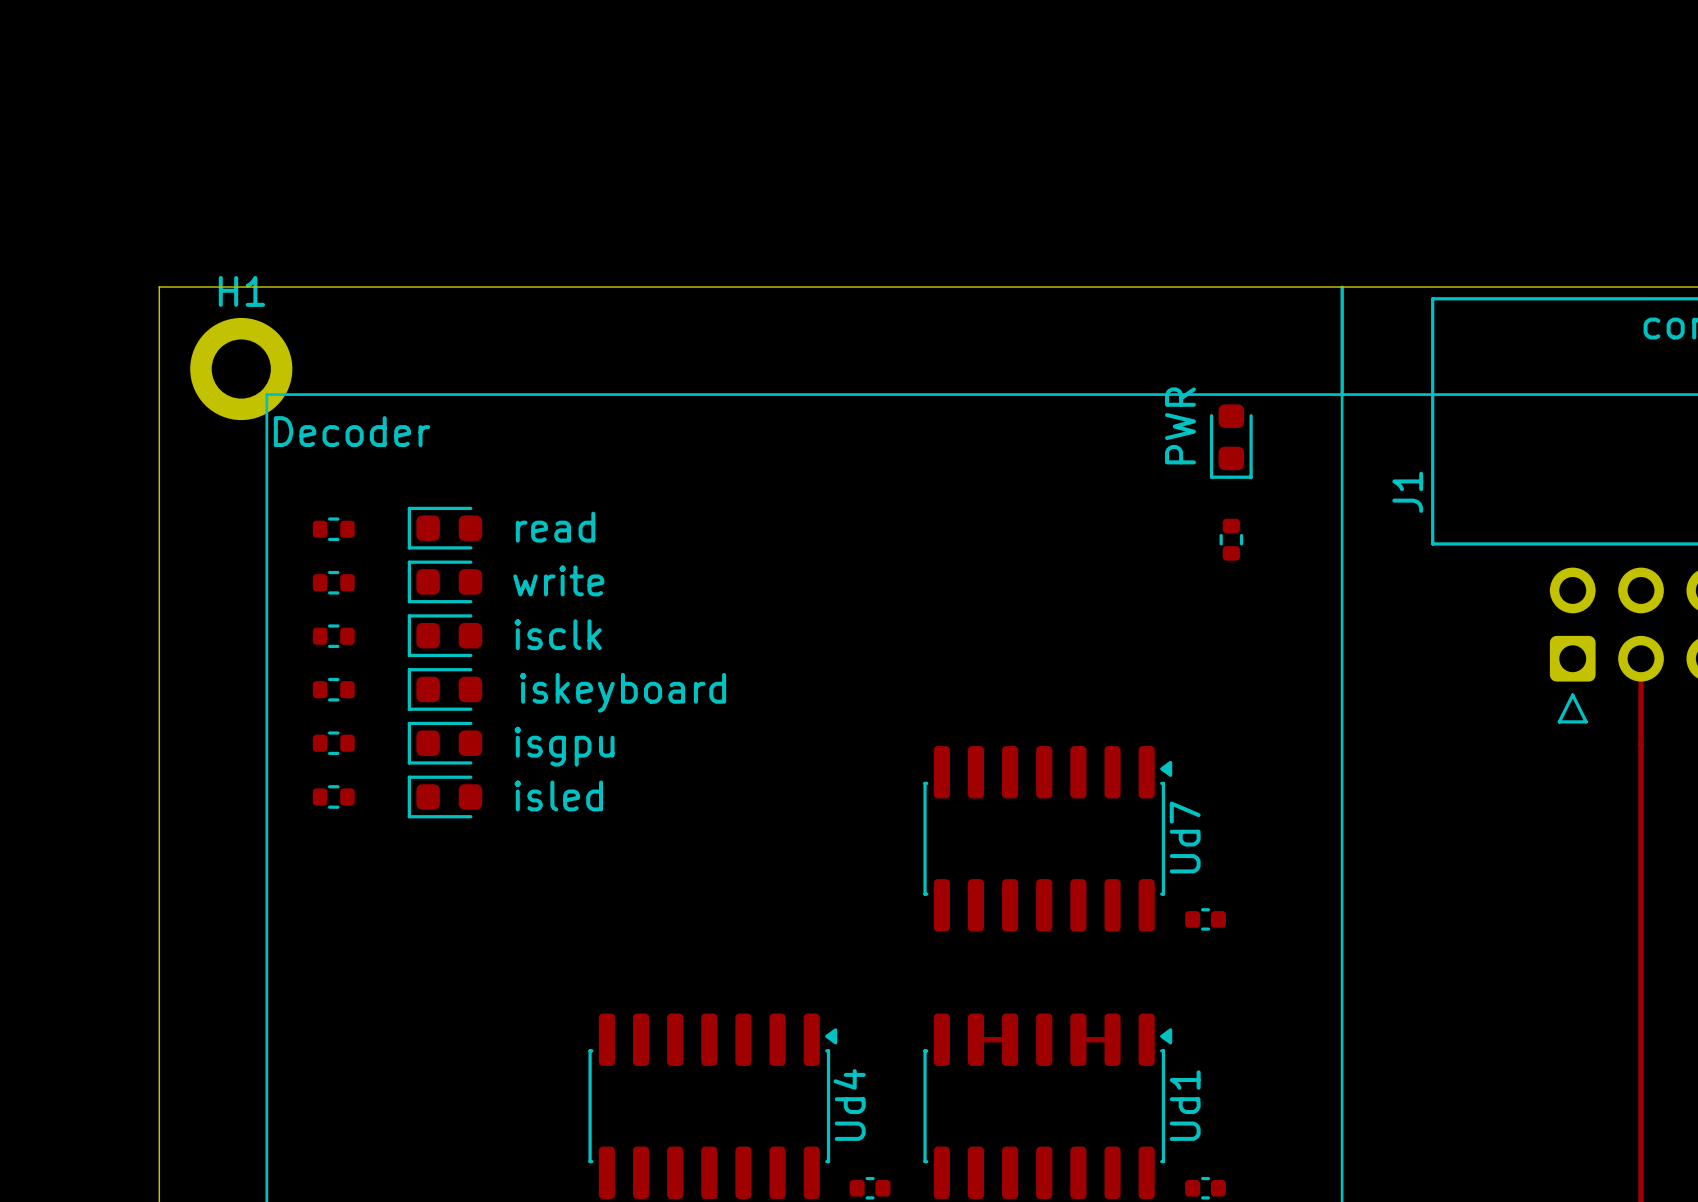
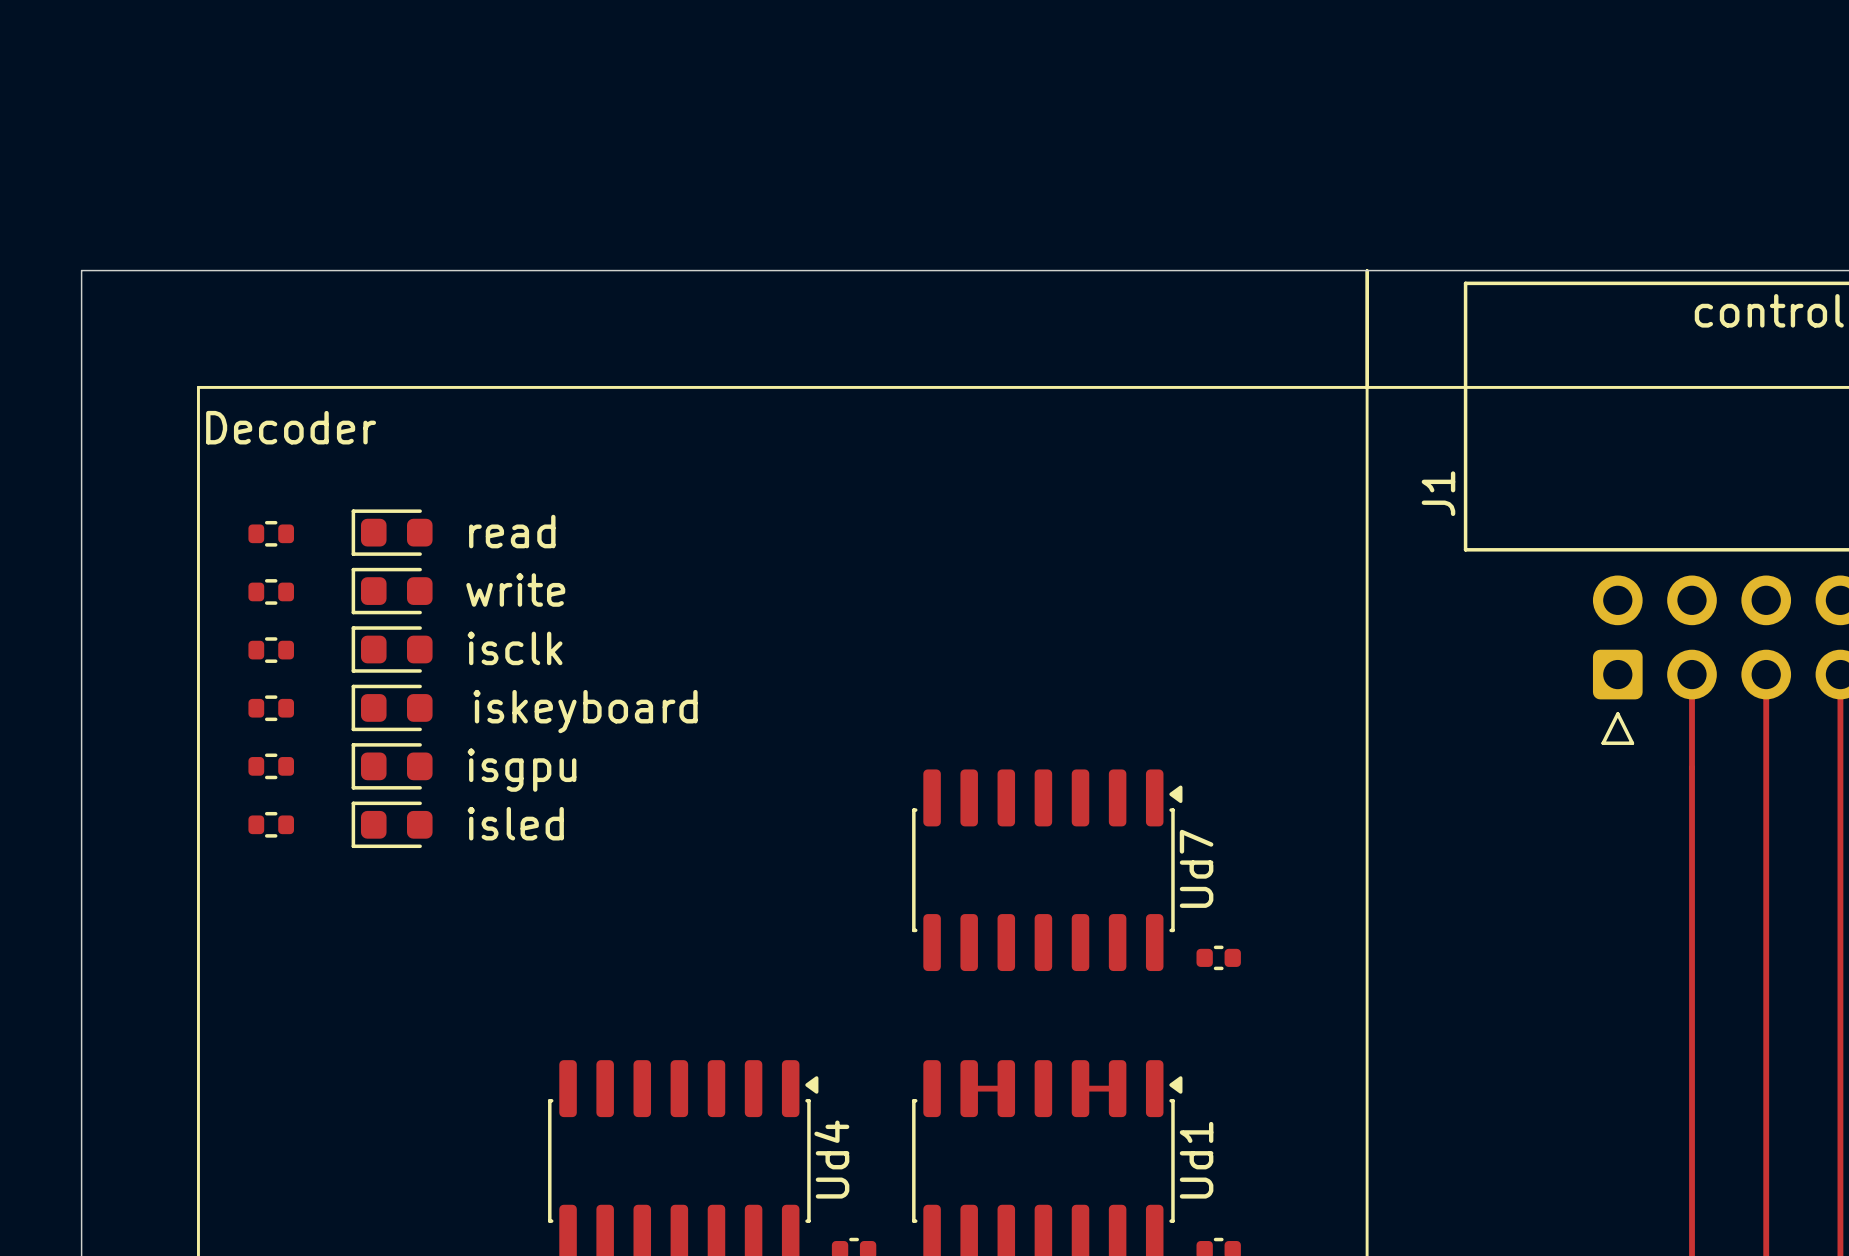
H1: (241, 369) -> none
text: PWR (1180, 425) -> none
part: (1231, 441) -> none
part: (1231, 539) -> none

